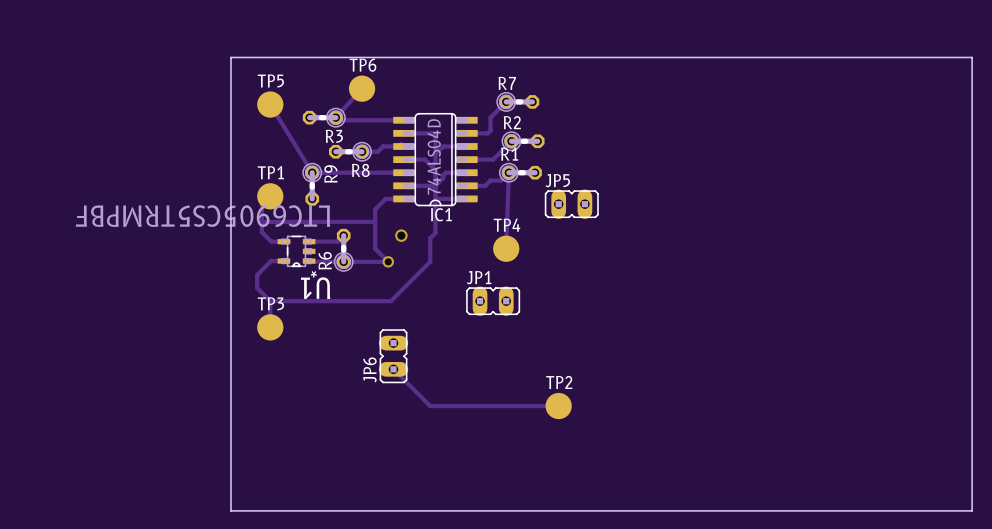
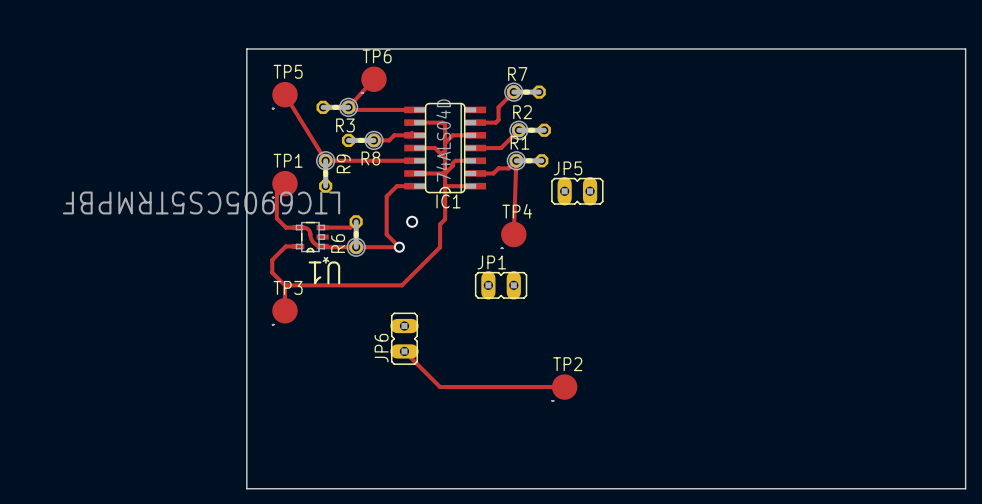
track: (261, 221) (375, 221) -> none
track: none -> (303, 227) (308, 230) (313, 242) (322, 246)

